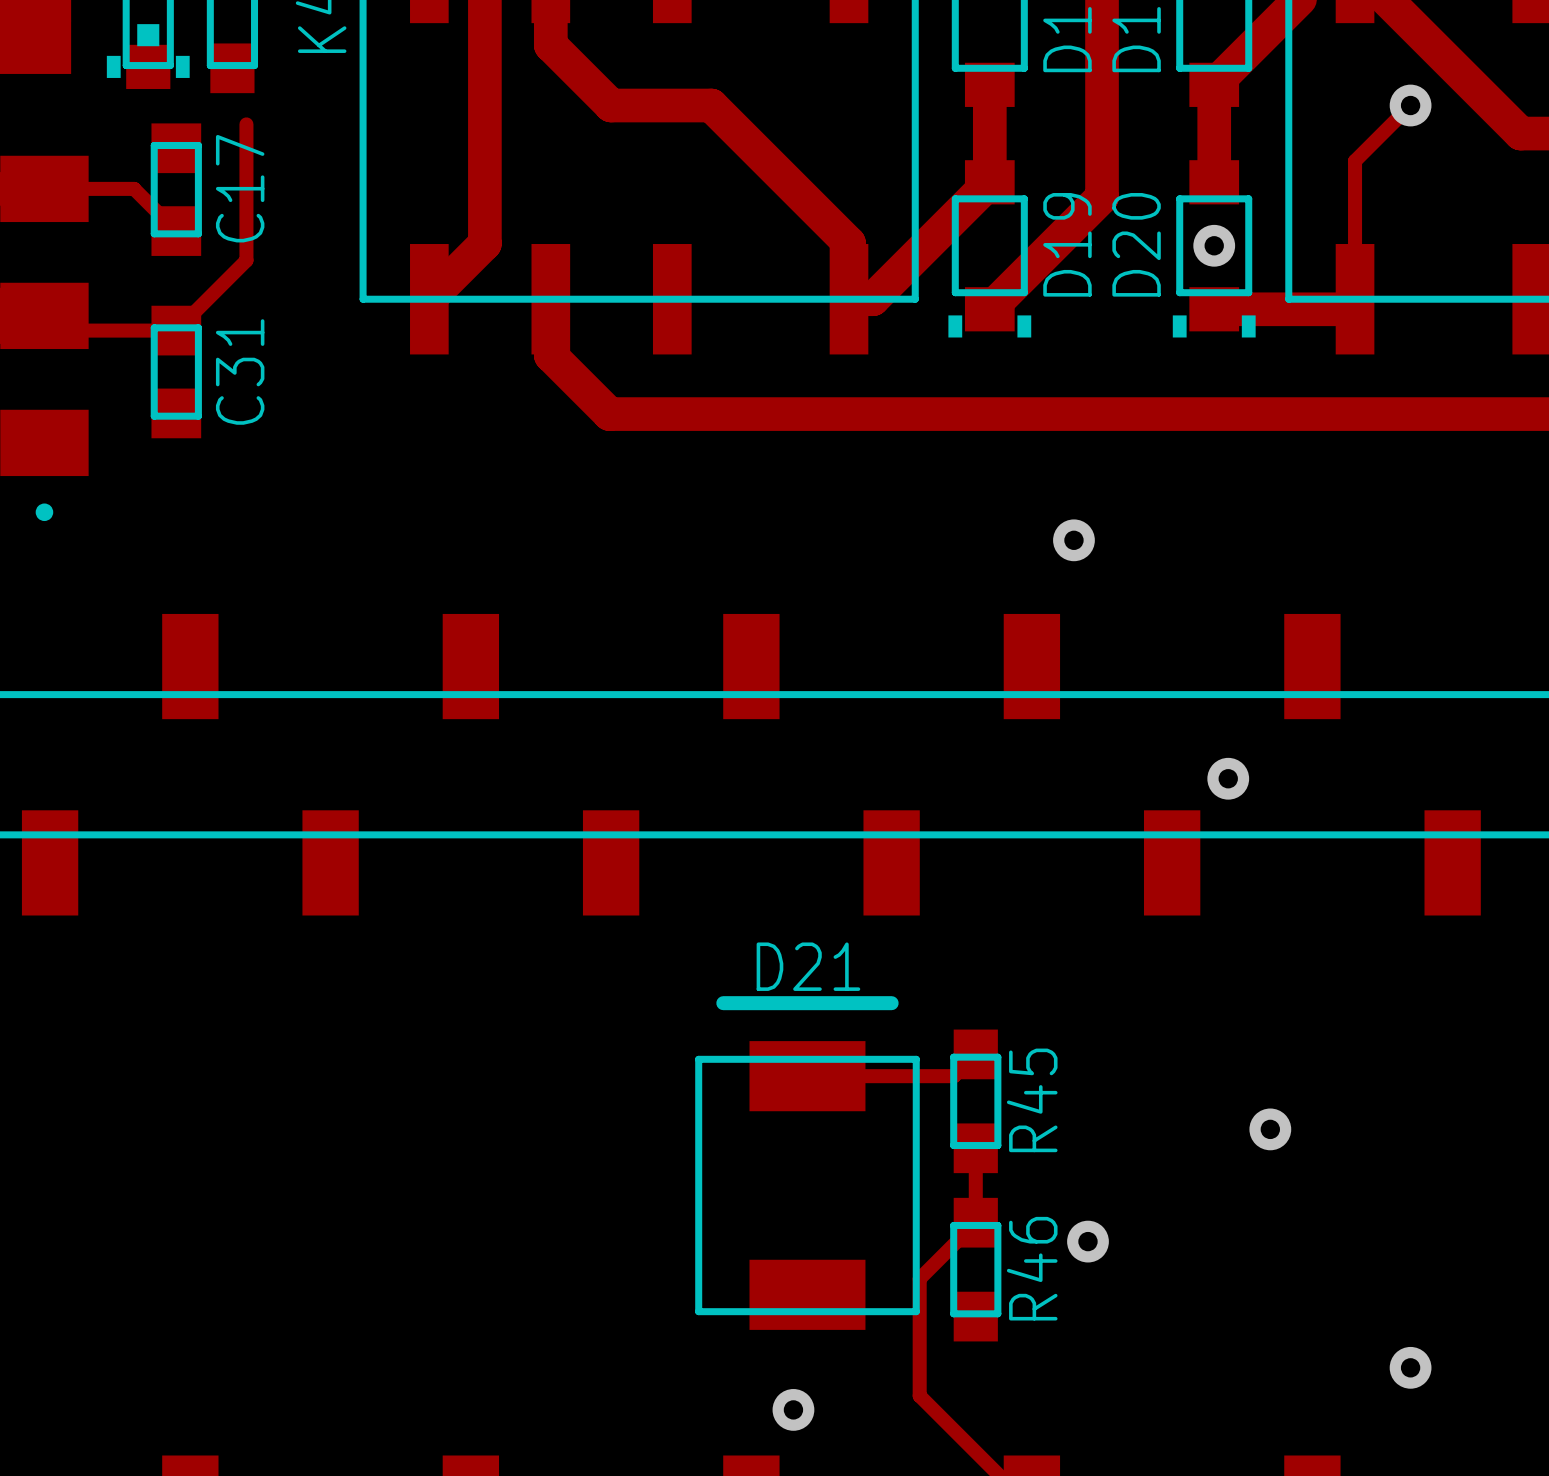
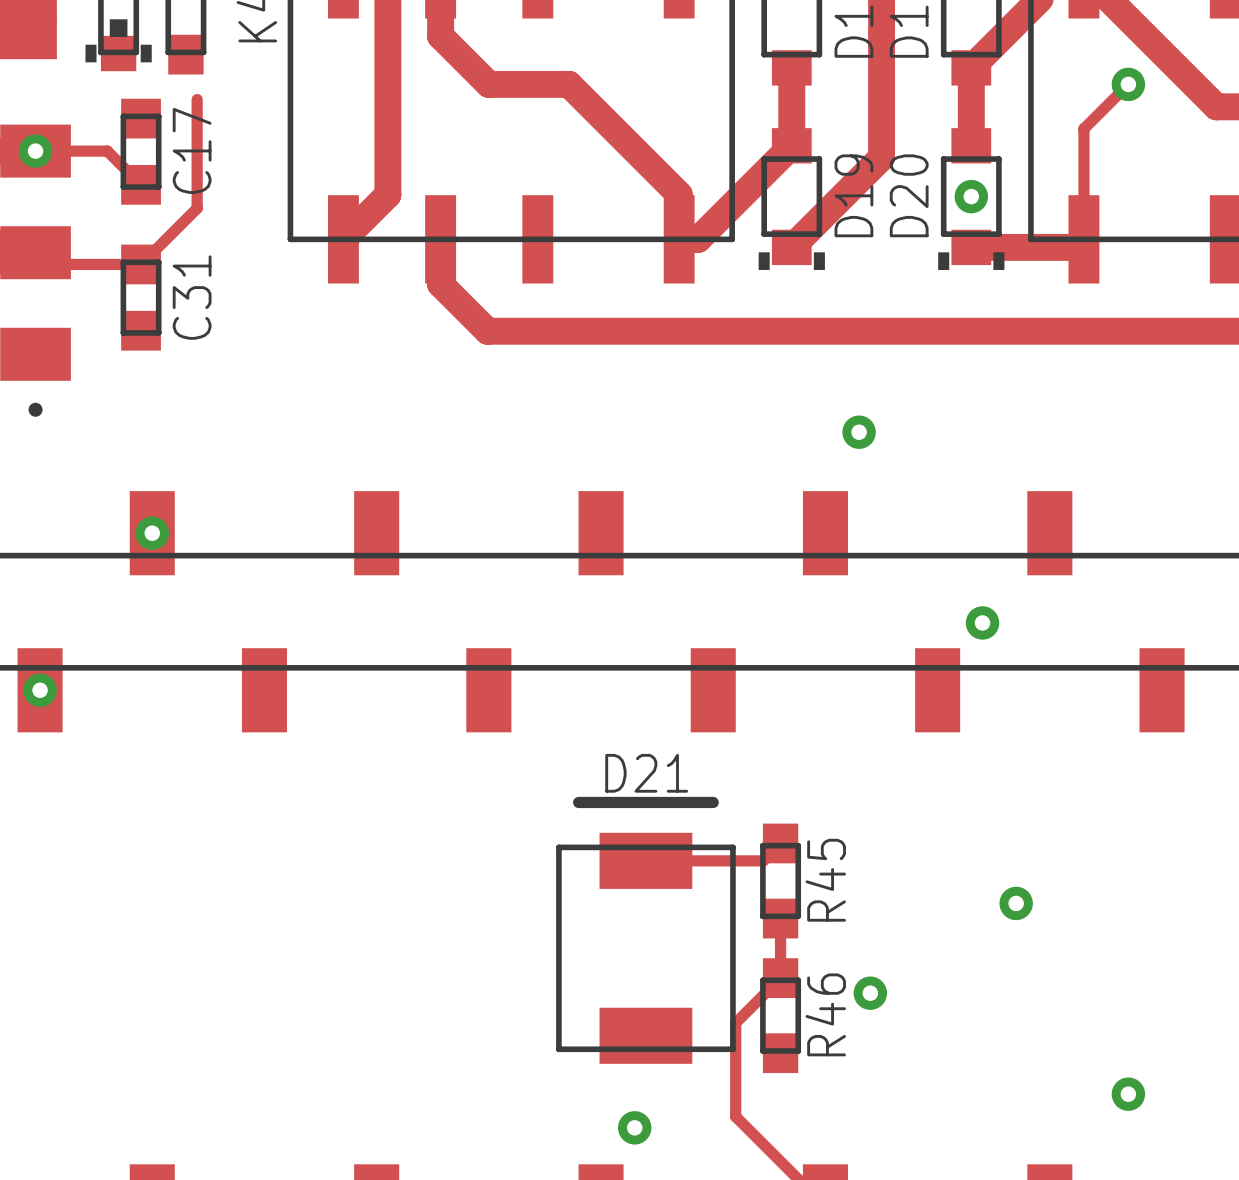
via: none -> (35, 151)
via: none -> (152, 533)
via: none -> (40, 690)

